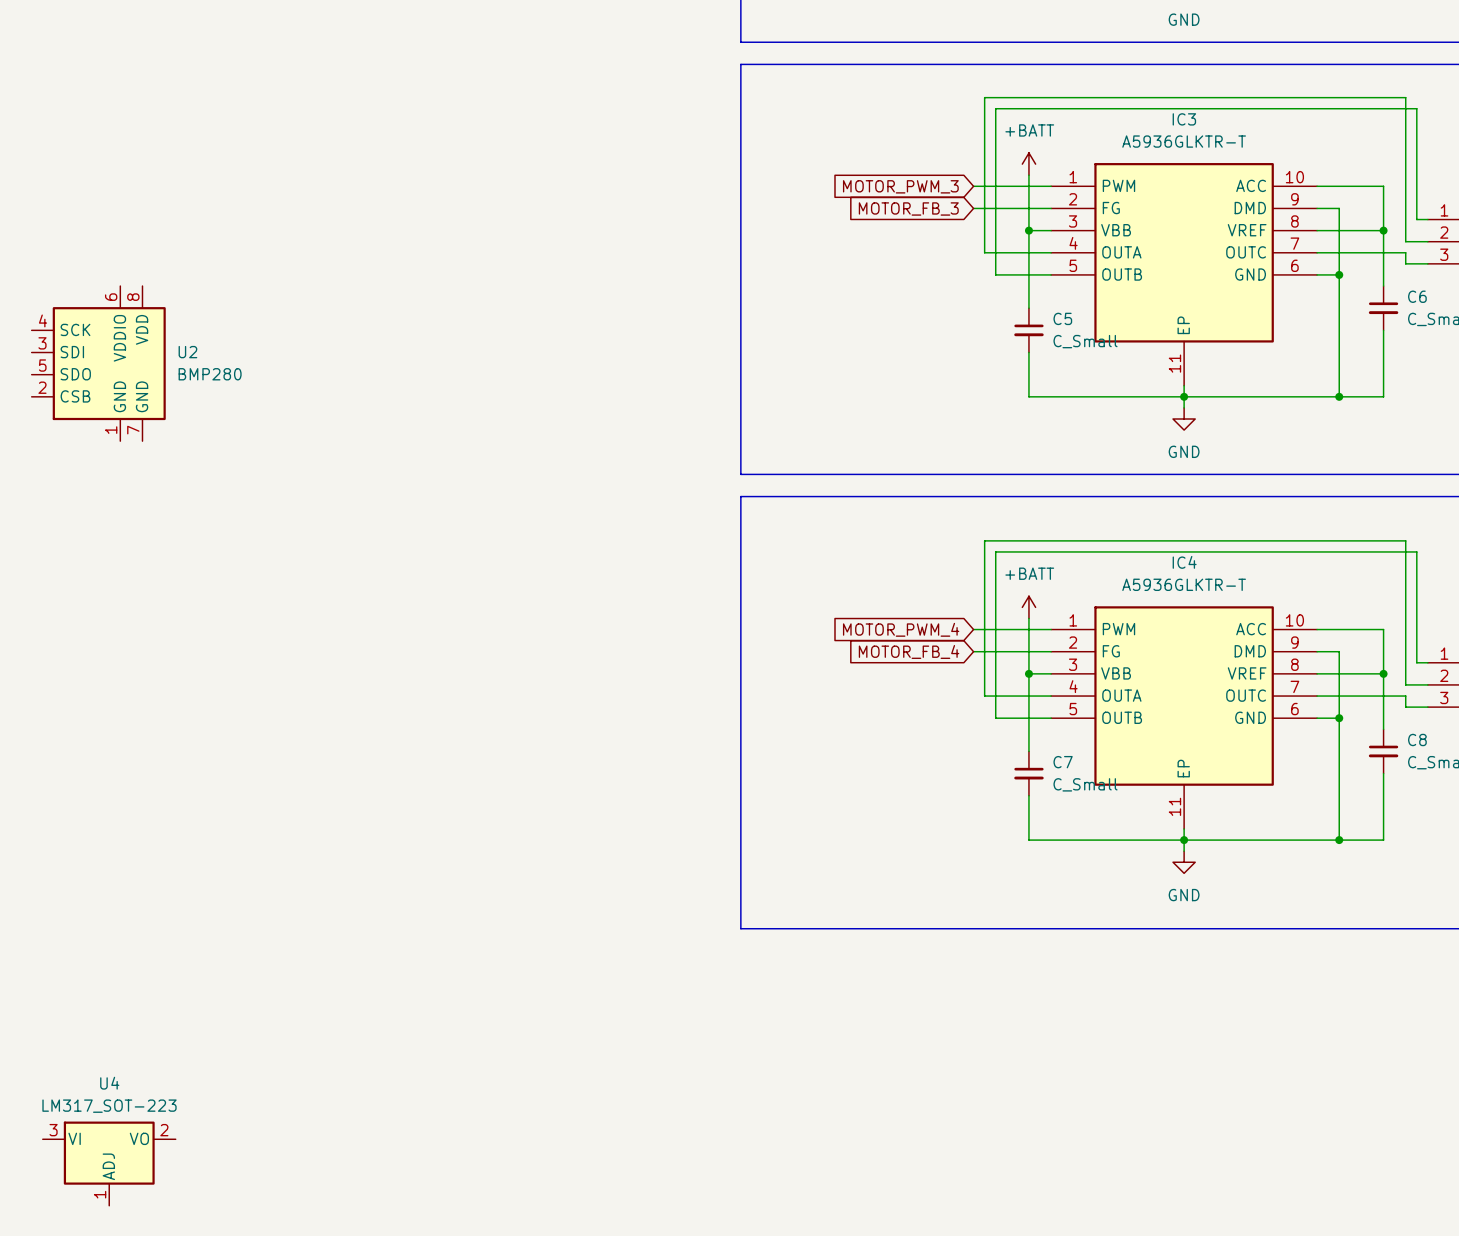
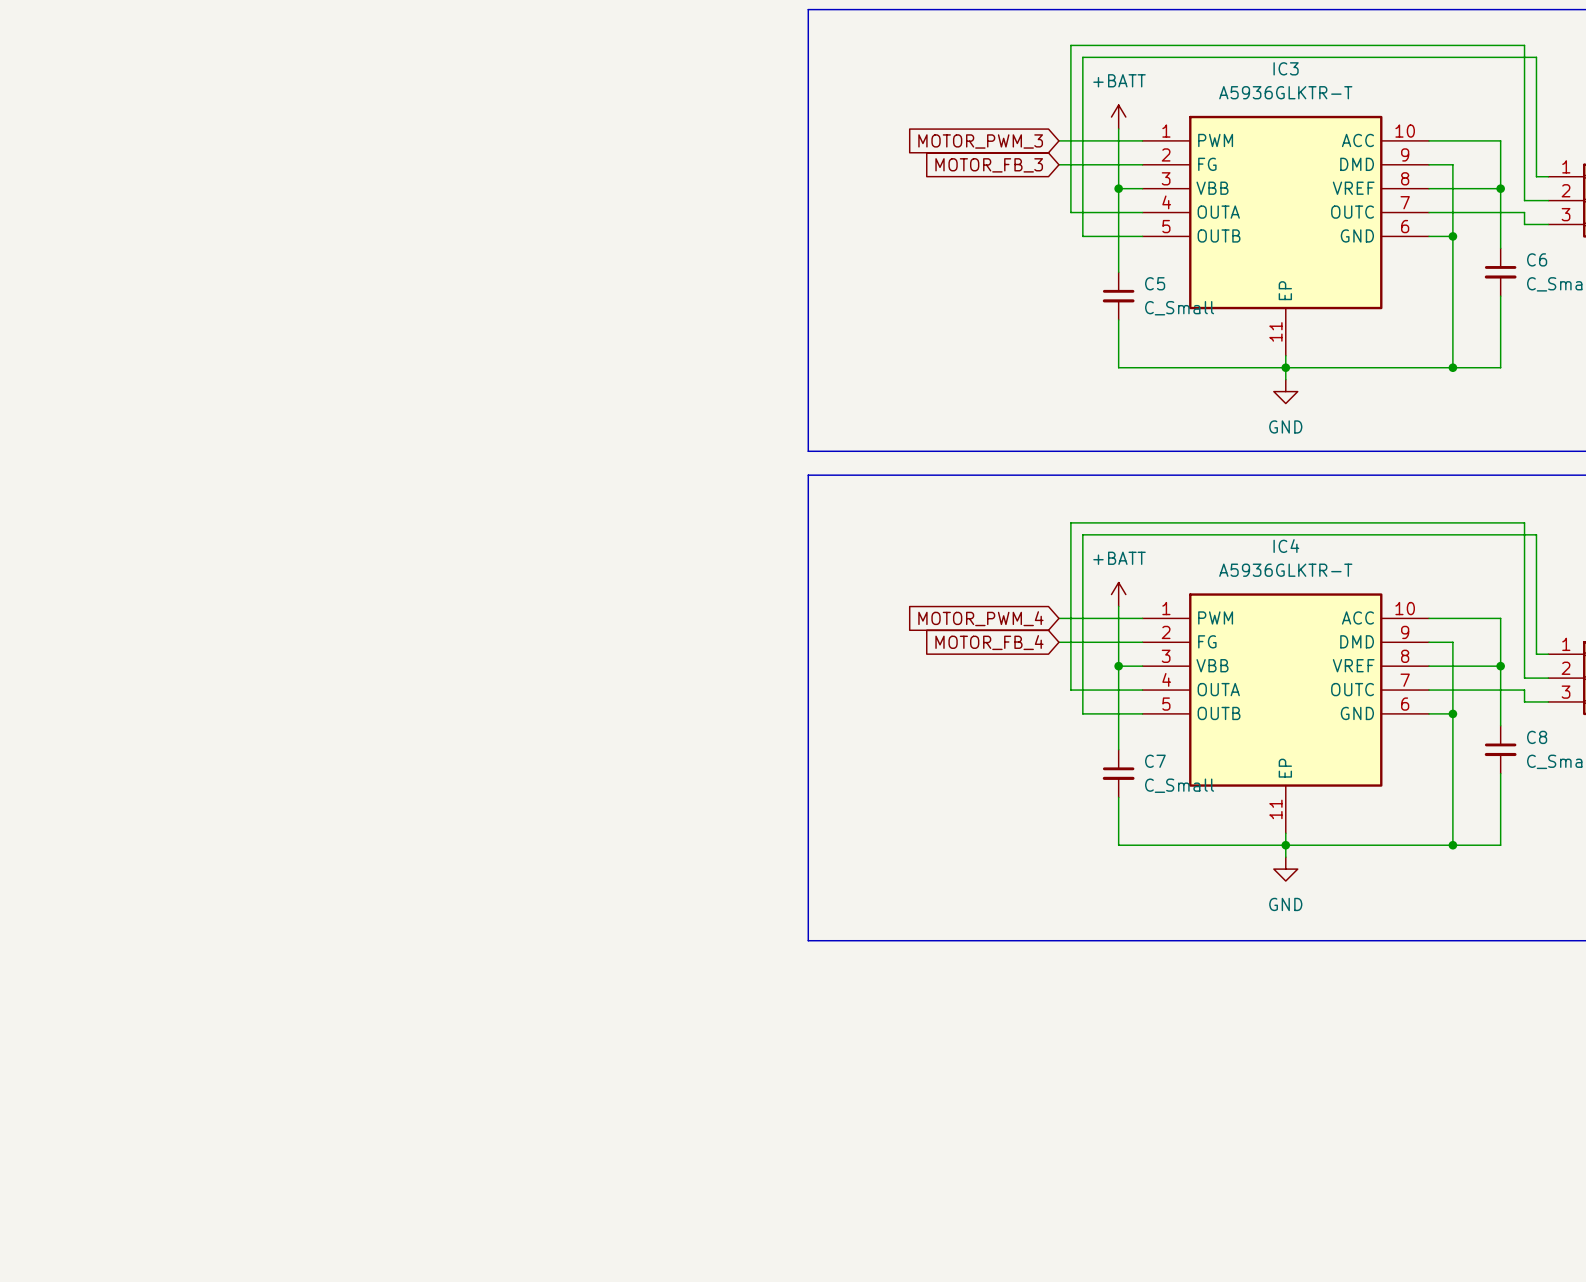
U2: BMP280 (98, 363) -> none
U4: LM317_SOT-223 (109, 1163) -> none

